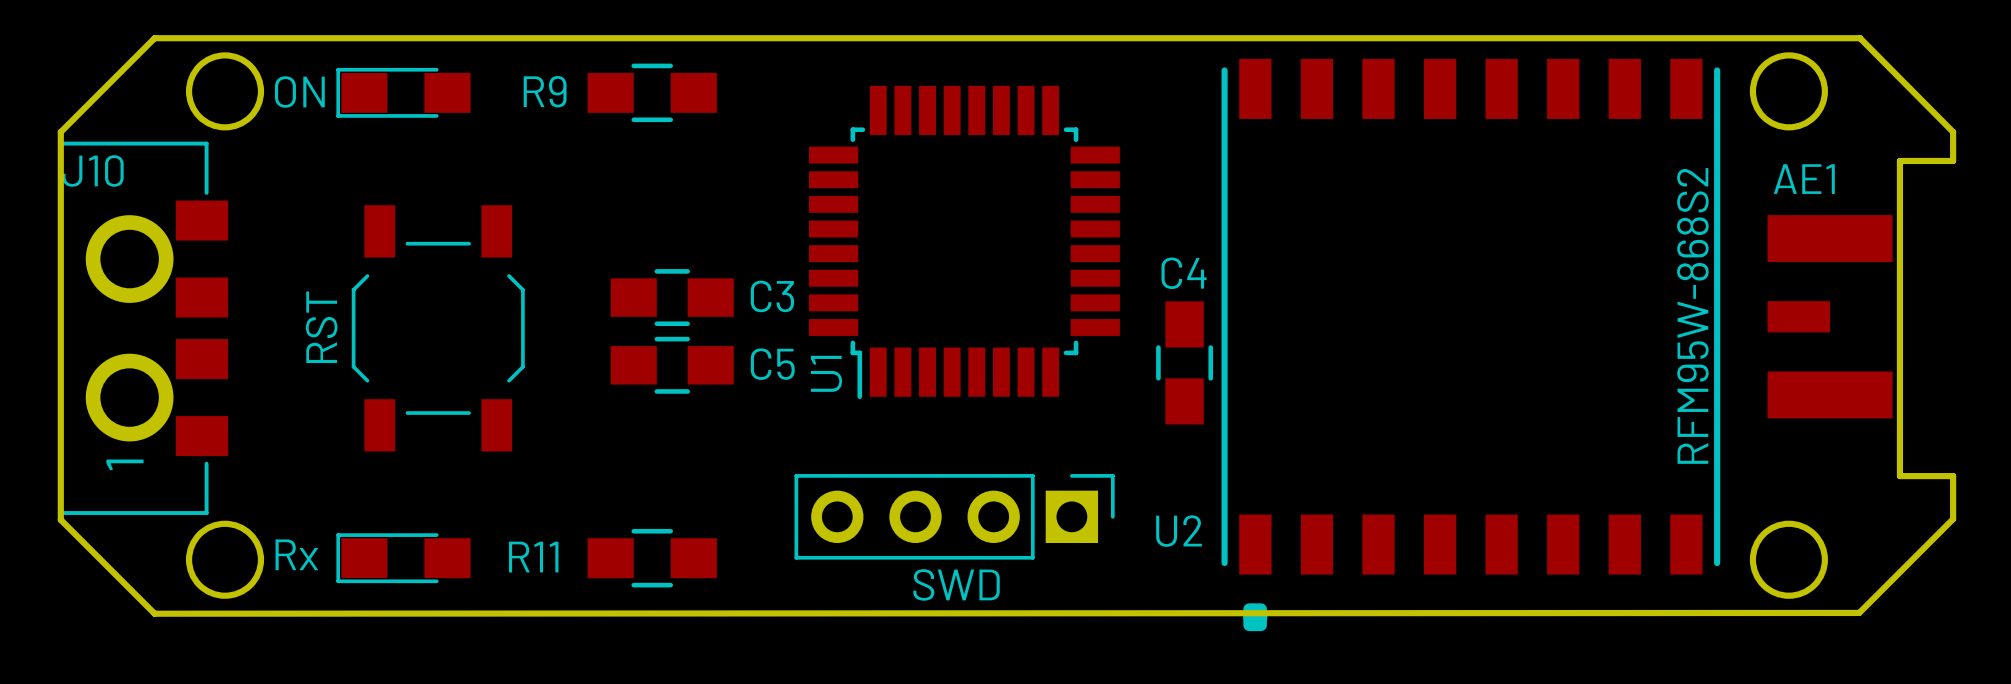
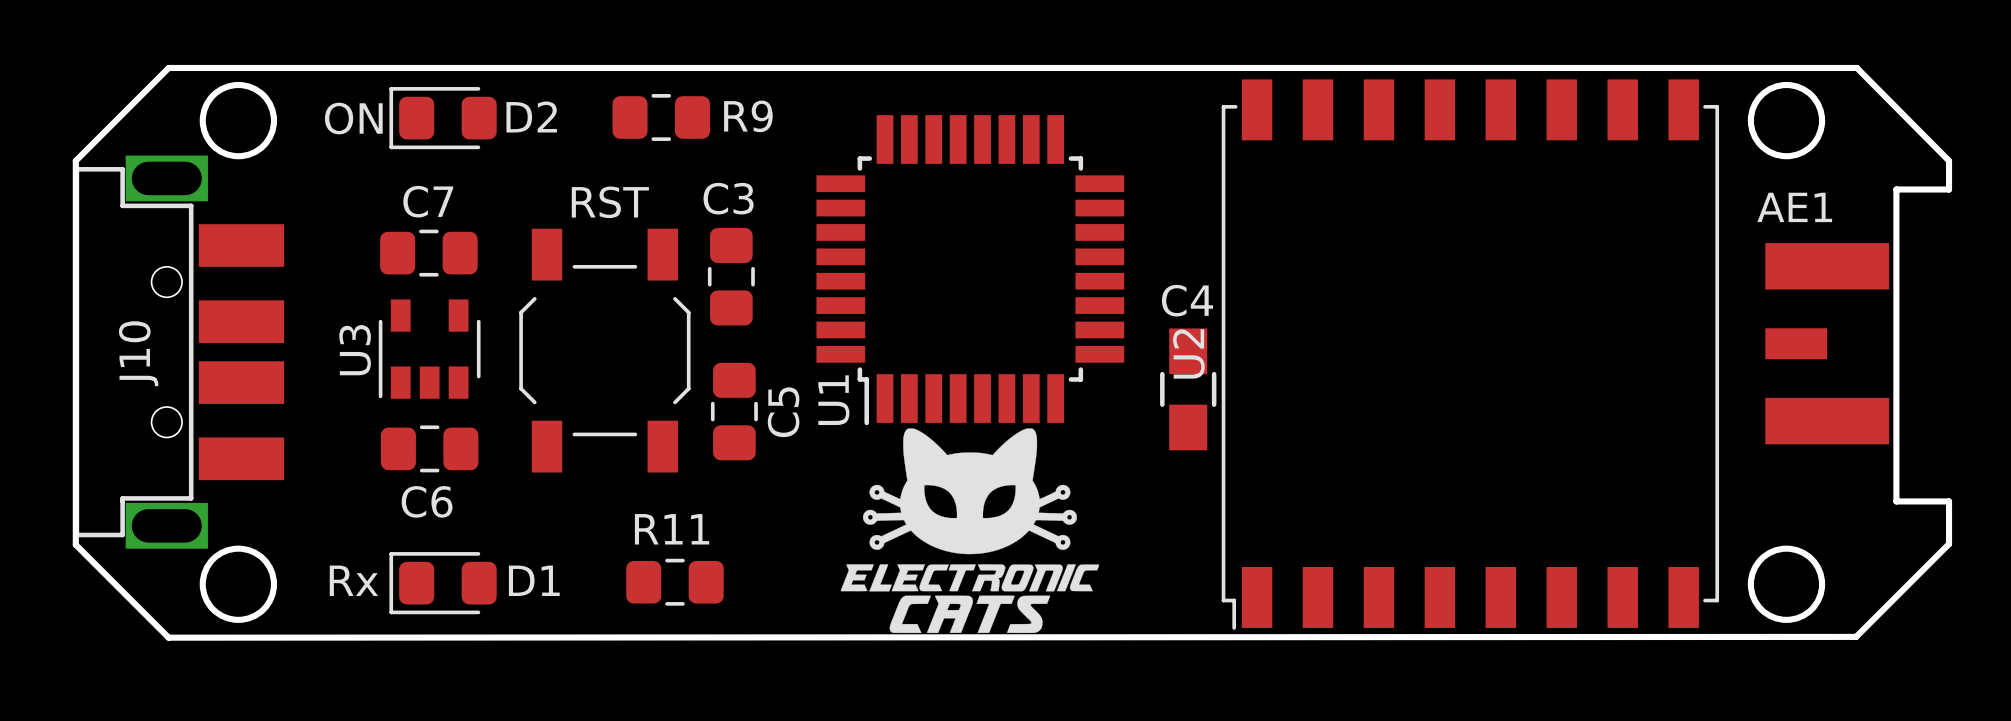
U2 footprint: [1221, 58, 1721, 632] -> [1221, 79, 1720, 630]
R9 footprint: [587, 63, 717, 123] -> [612, 94, 711, 141]
D2: none -> (443, 118)
R9 name position: R9 (545, 91) -> R9 (748, 116)
text position: ON (299, 92) -> ON (353, 118)
part: (403, 92) -> none
J10 footprint: [58, 141, 229, 515] -> [74, 155, 285, 549]
J10 name position: J10 (93, 170) -> J10 (138, 353)
C7: none -> (428, 253)
C3 footprint: [610, 269, 734, 327] -> [707, 227, 755, 326]
C3 name position: C3 (772, 296) -> C3 (728, 198)
U2 value: RFM95W-868S2 (1692, 315) -> none
U3: none -> (429, 349)
part value rotation: 0° (321, 327) -> 90° clockwise (610, 202)
part value position: RST (321, 327) -> RST (610, 202)
part position: (438, 328) -> (604, 350)
C5 footprint: [610, 336, 734, 394] -> [710, 362, 758, 461]
drawing: none -> [840, 428, 1100, 634]
C6: none -> (429, 448)
part: SWD (954, 516) -> none
R11 footprint: [587, 528, 717, 588] -> [626, 558, 724, 606]
U2 name position: U2 (1179, 531) -> U2 (1188, 353)
R11 name position: R11 (533, 557) -> R11 (672, 529)
part: Rx (403, 558) -> none
D1: none -> Rx (443, 583)

